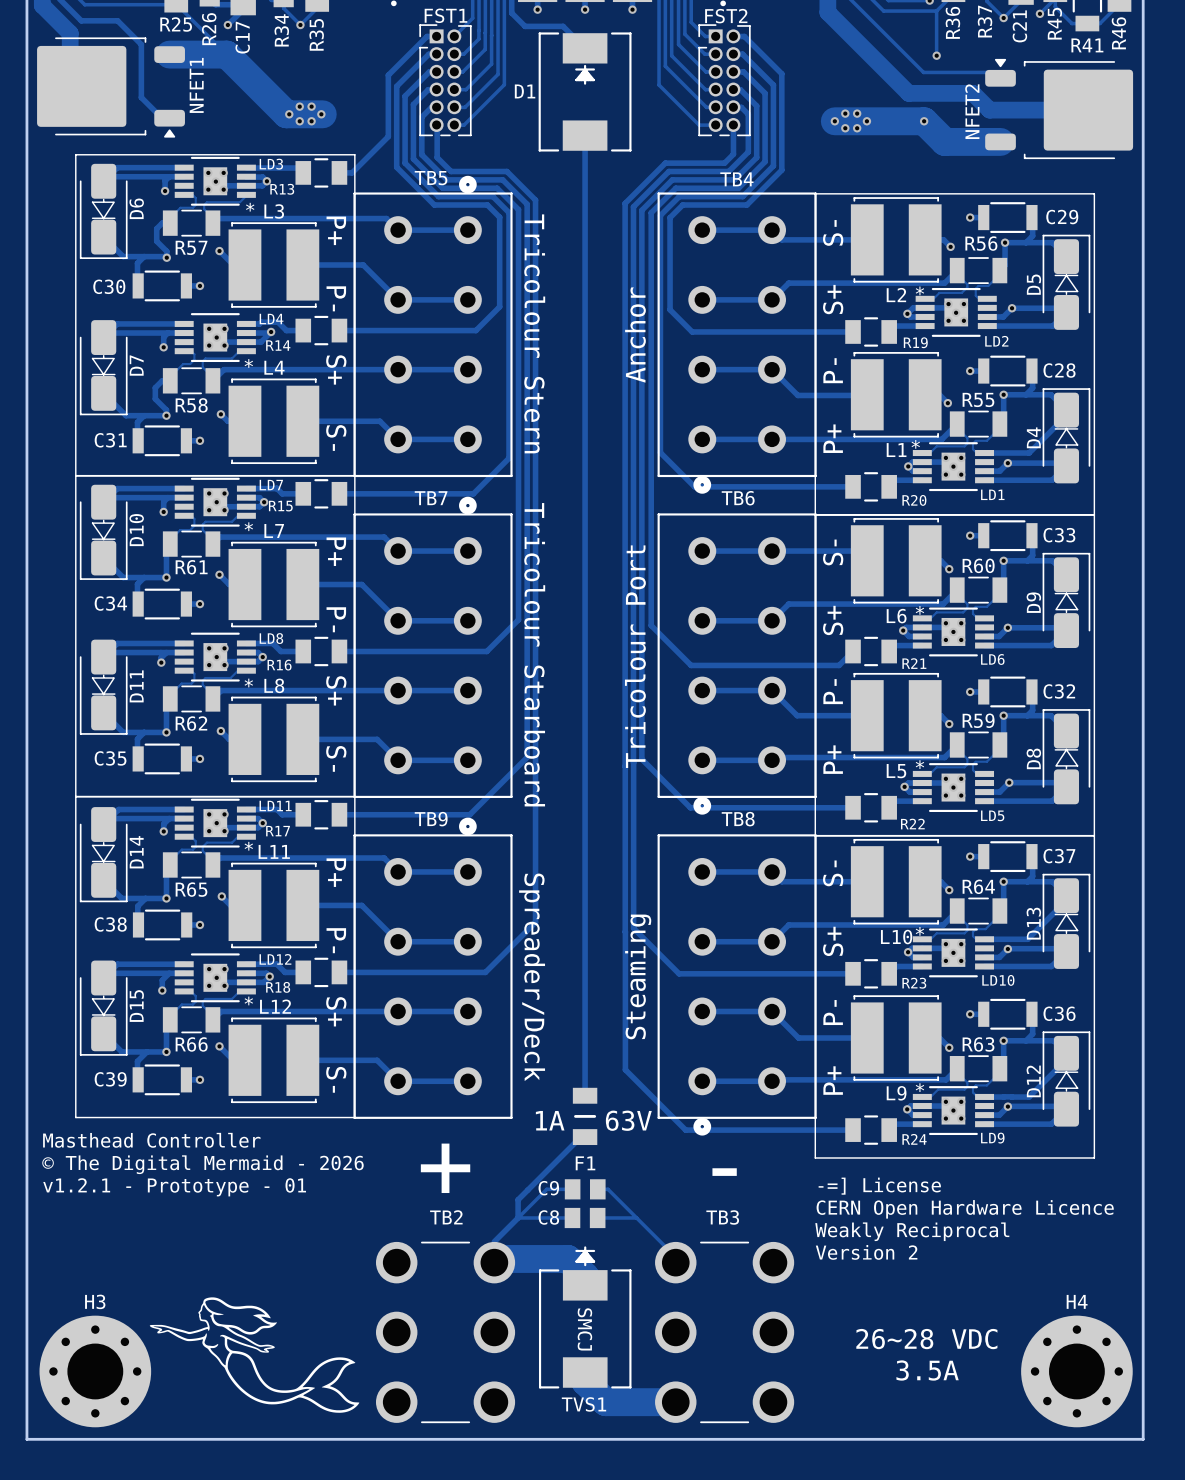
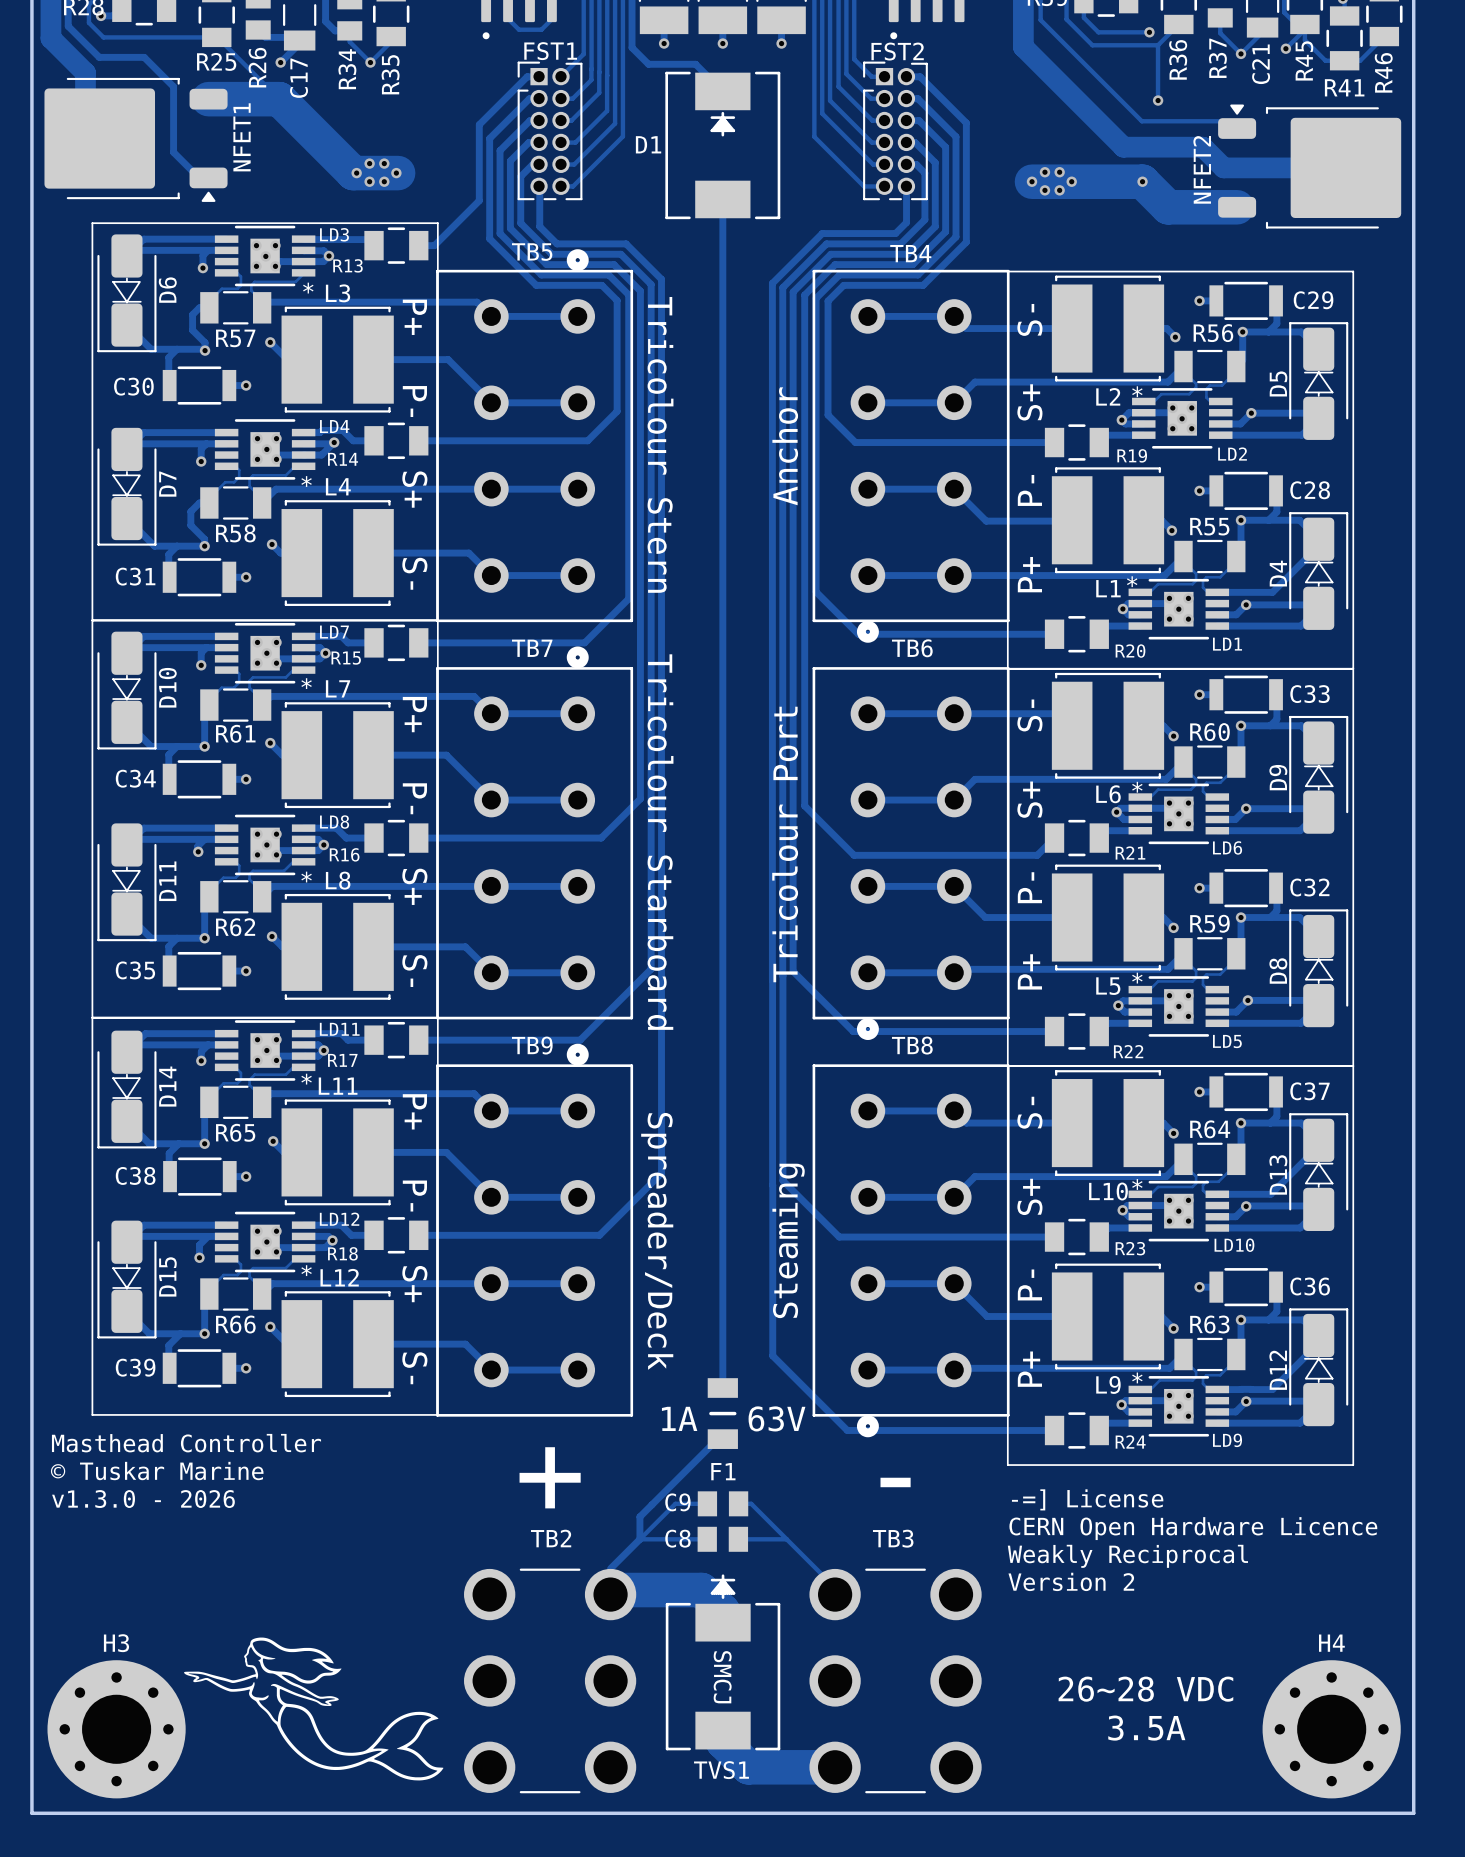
text: © The Digital Mermaid - 2026 (202, 1164) -> © Tuskar Marine (157, 1471)
text: v1.2.1 - Prototype - 01 (174, 1187) -> v1.3.0 - 2026 (143, 1499)

